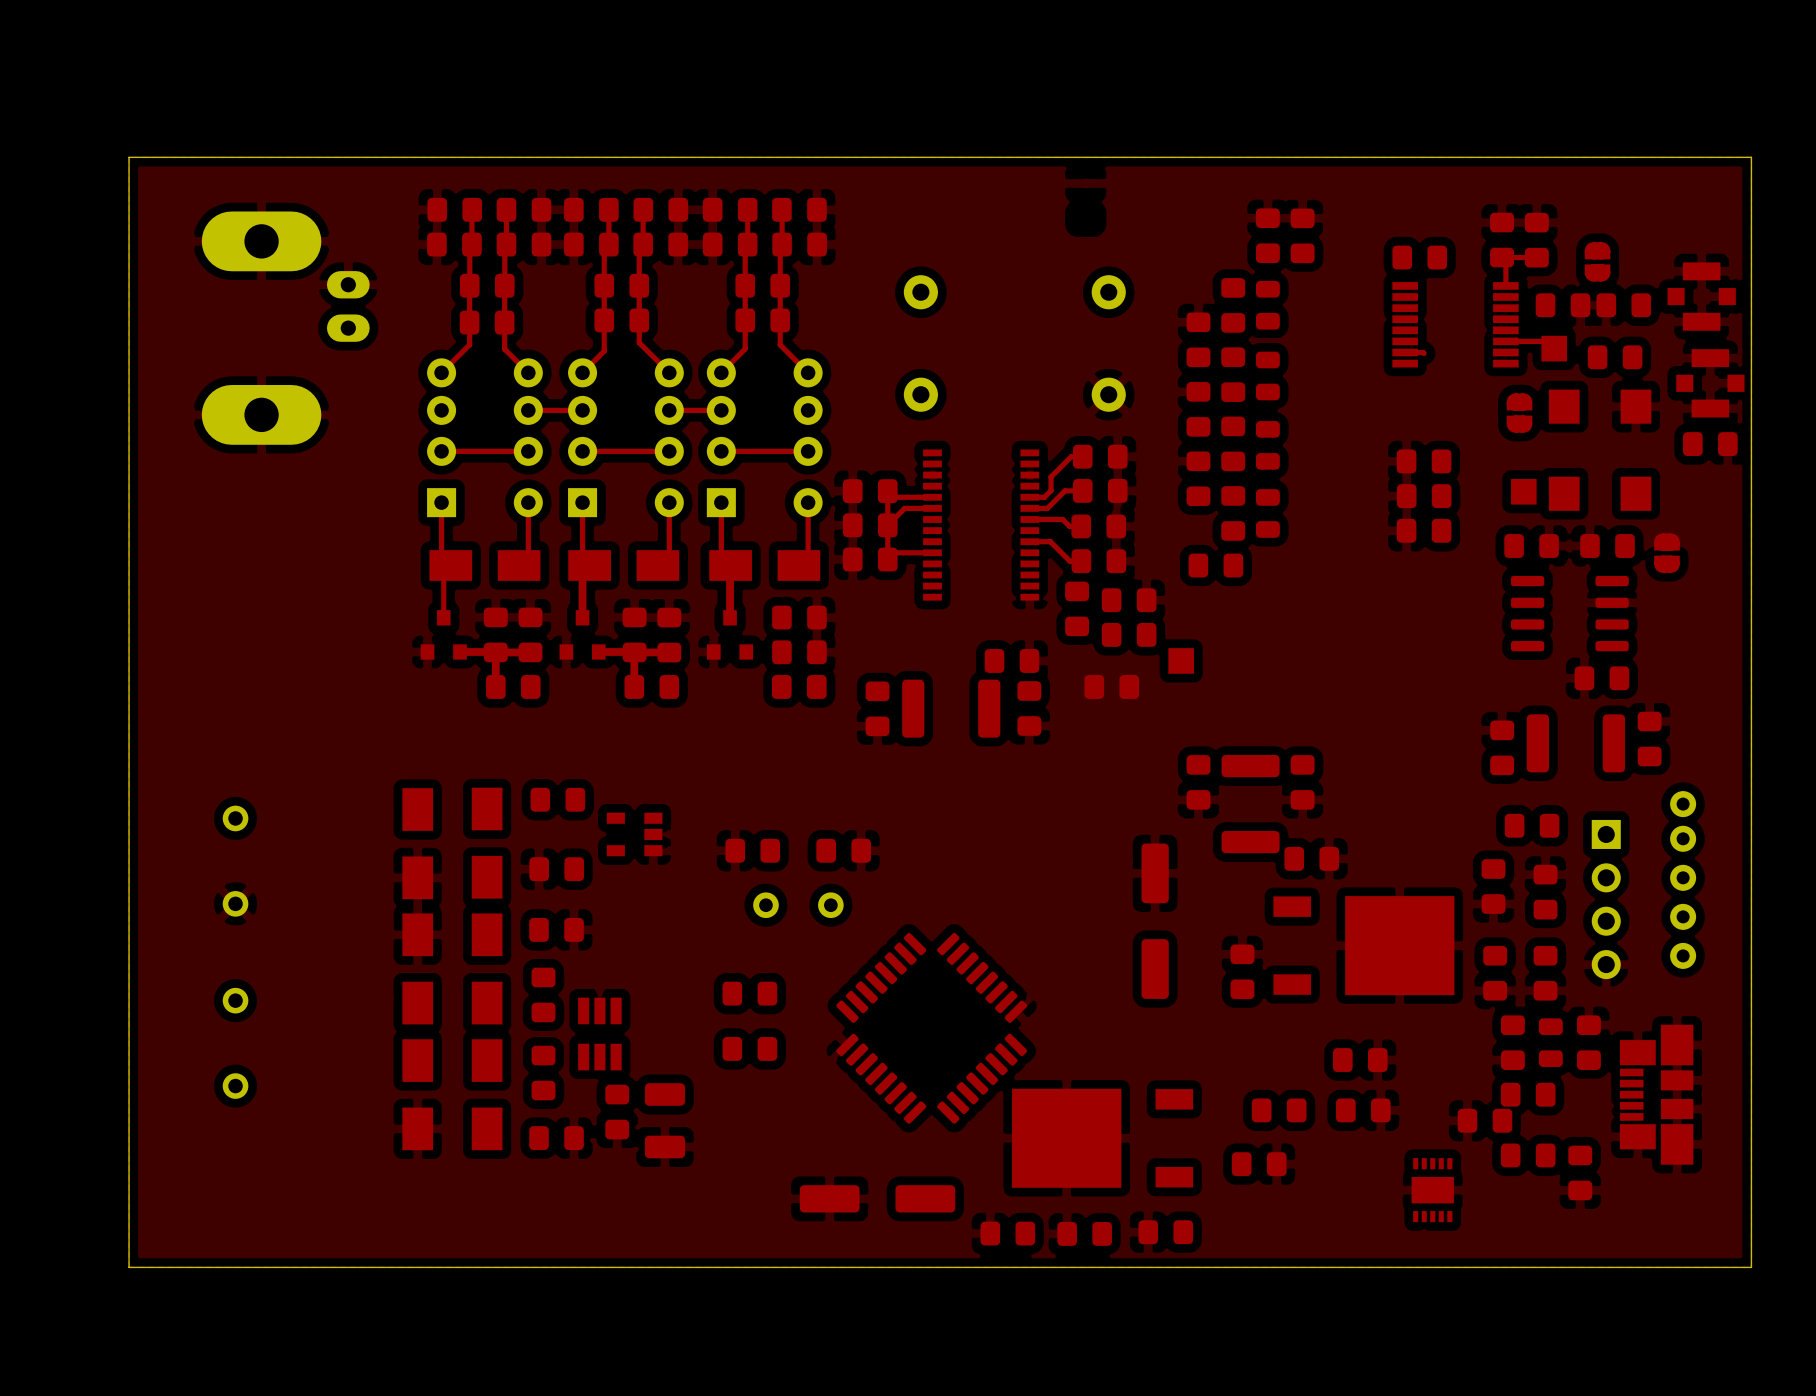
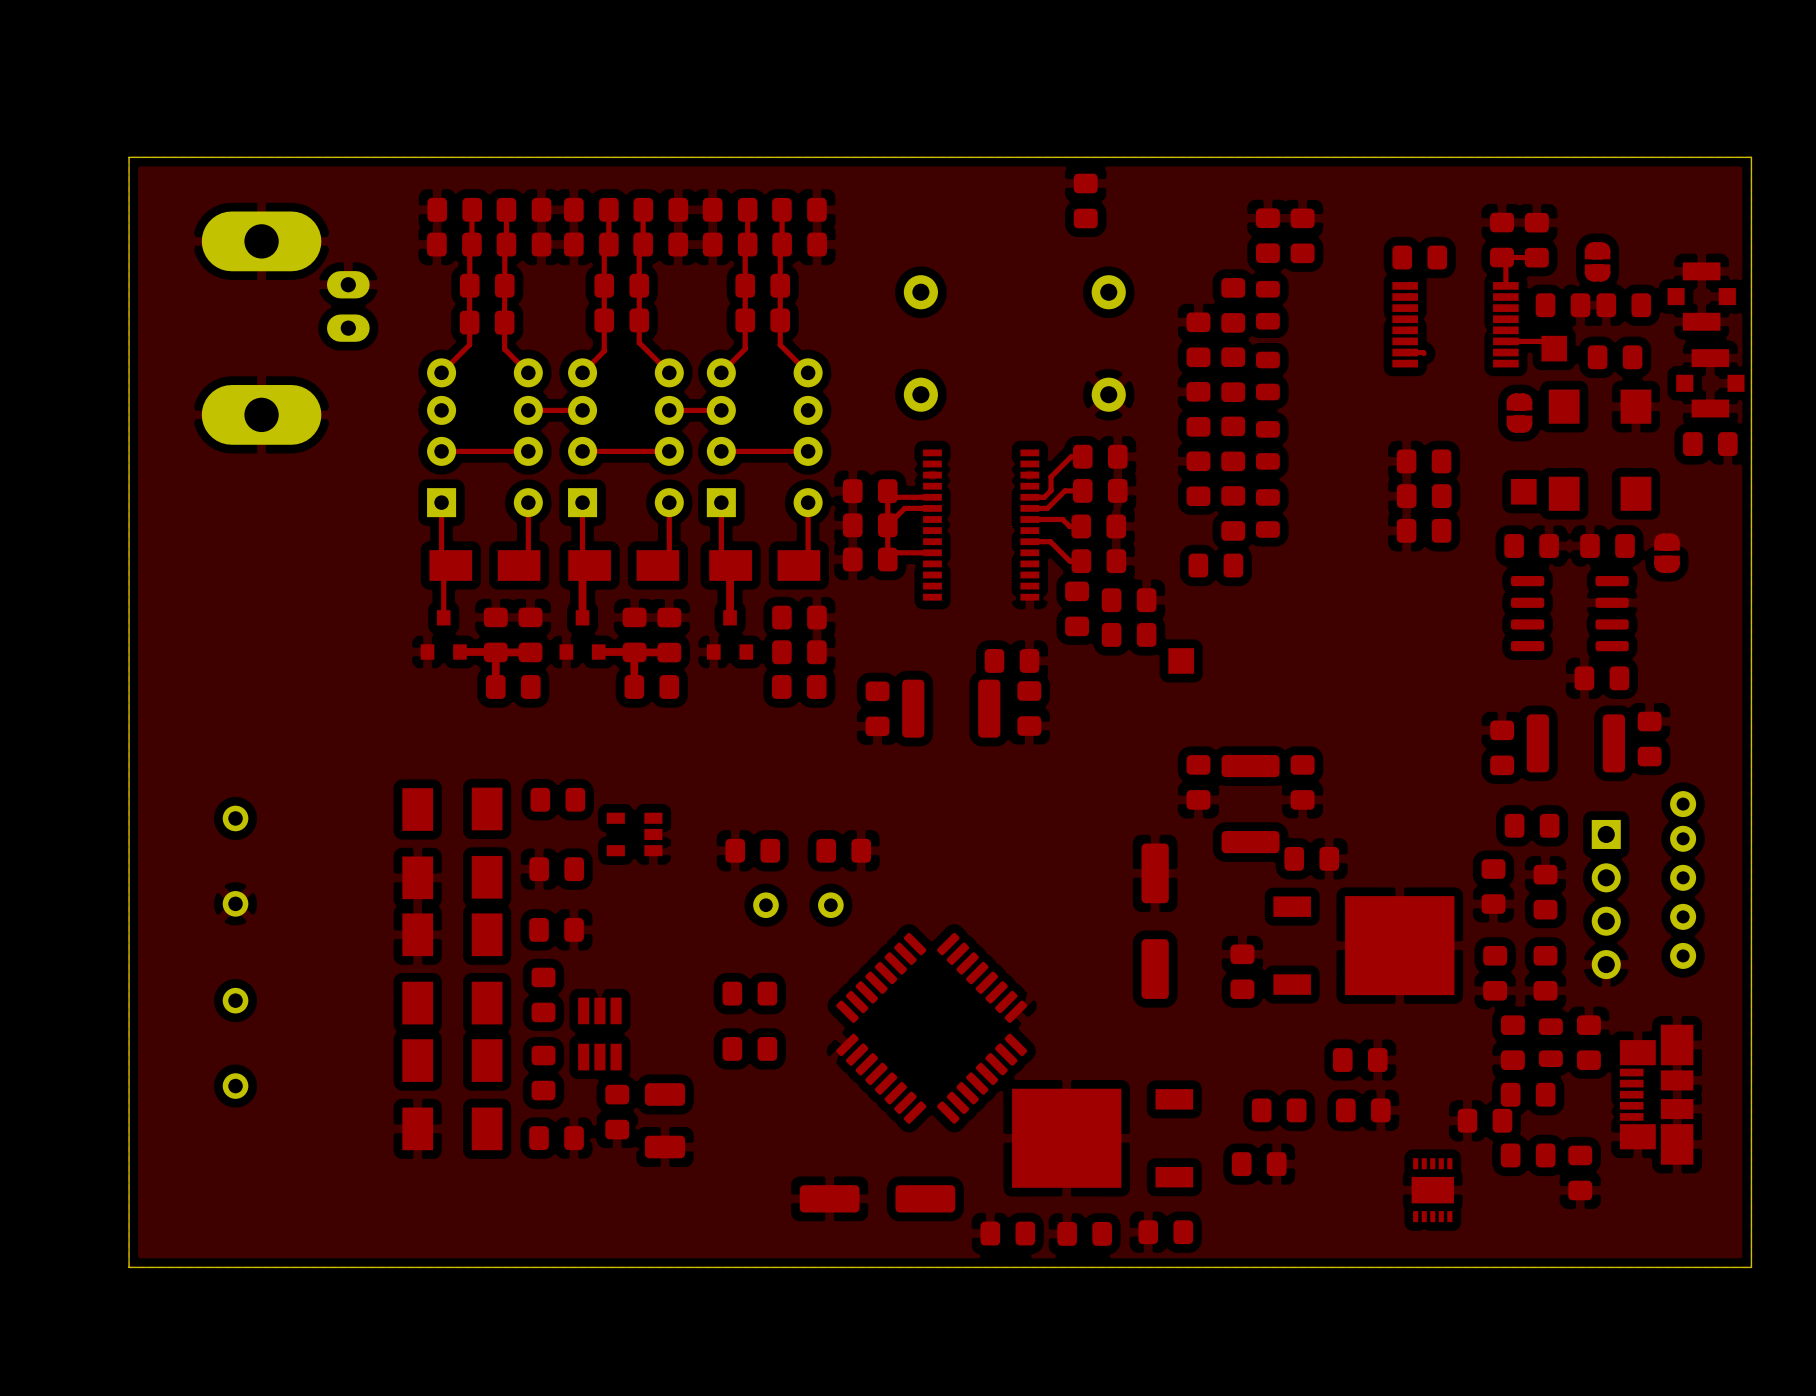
part: none -> (1085, 200)
part: (1111, 686) -> none

